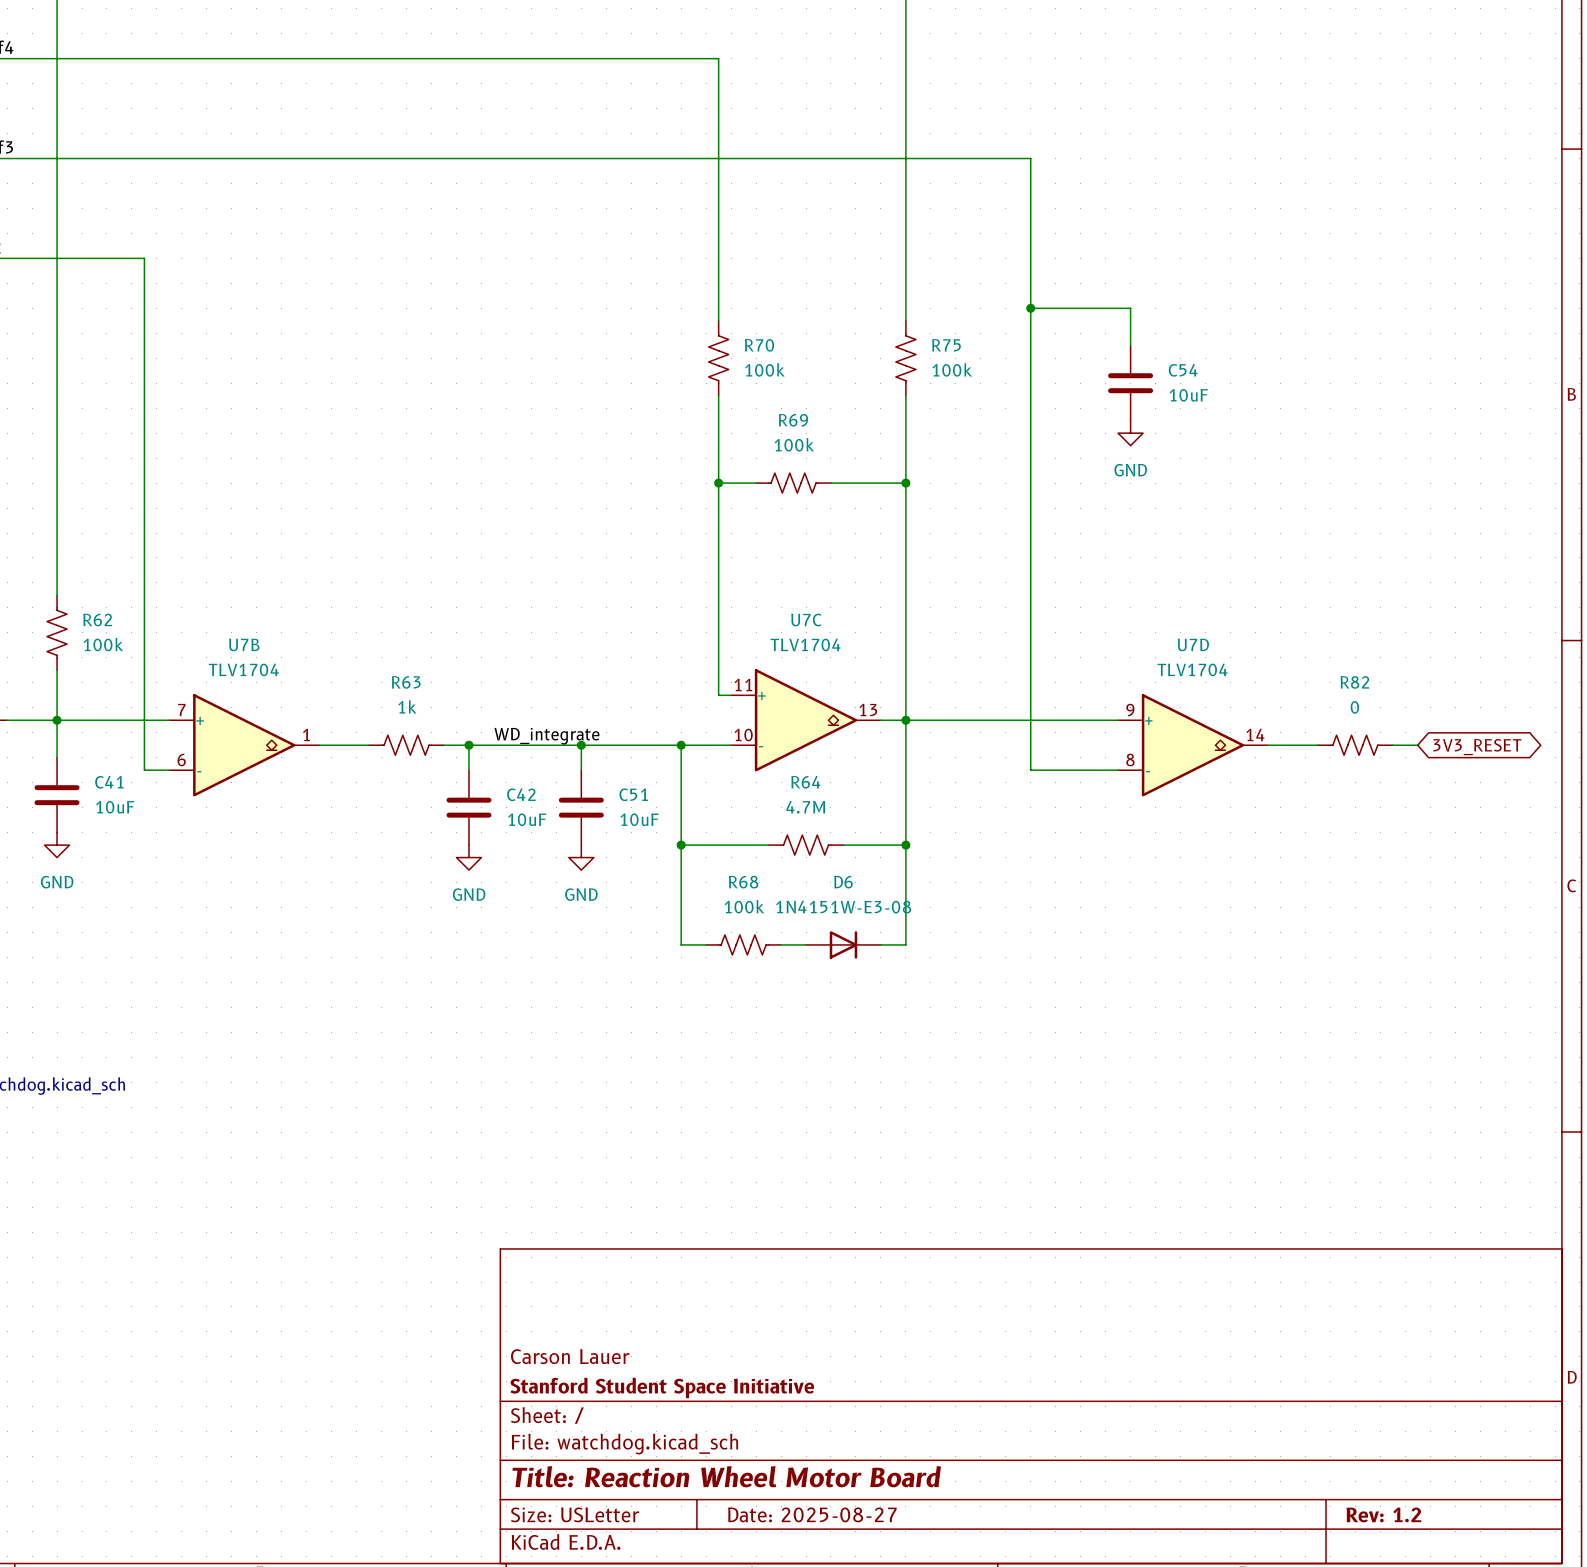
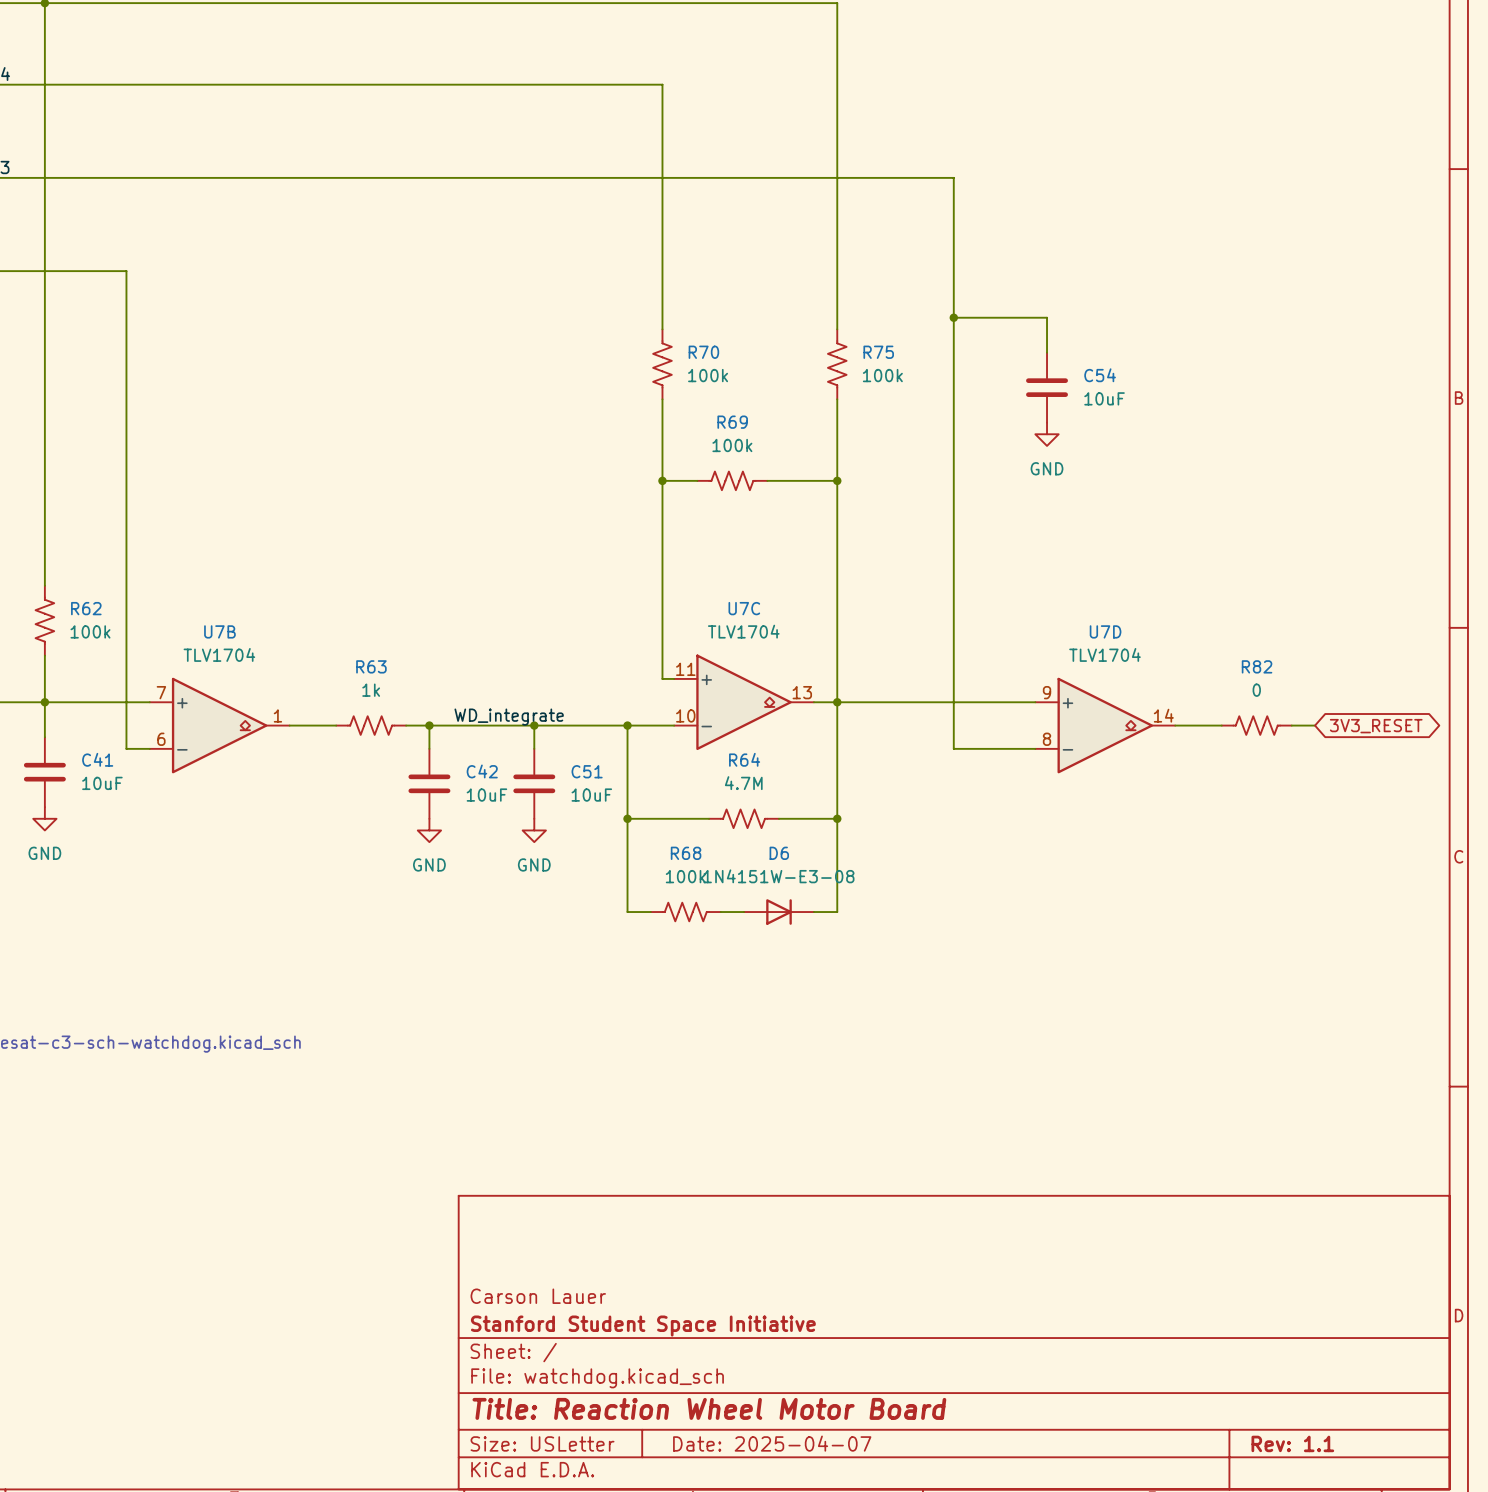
title block: Date: 2025-08-27 (812, 1514) -> Date: 2025-04-07 (772, 1443)
title block: Rev: 1.2 (1383, 1514) -> Rev: 1.1 (1292, 1443)

